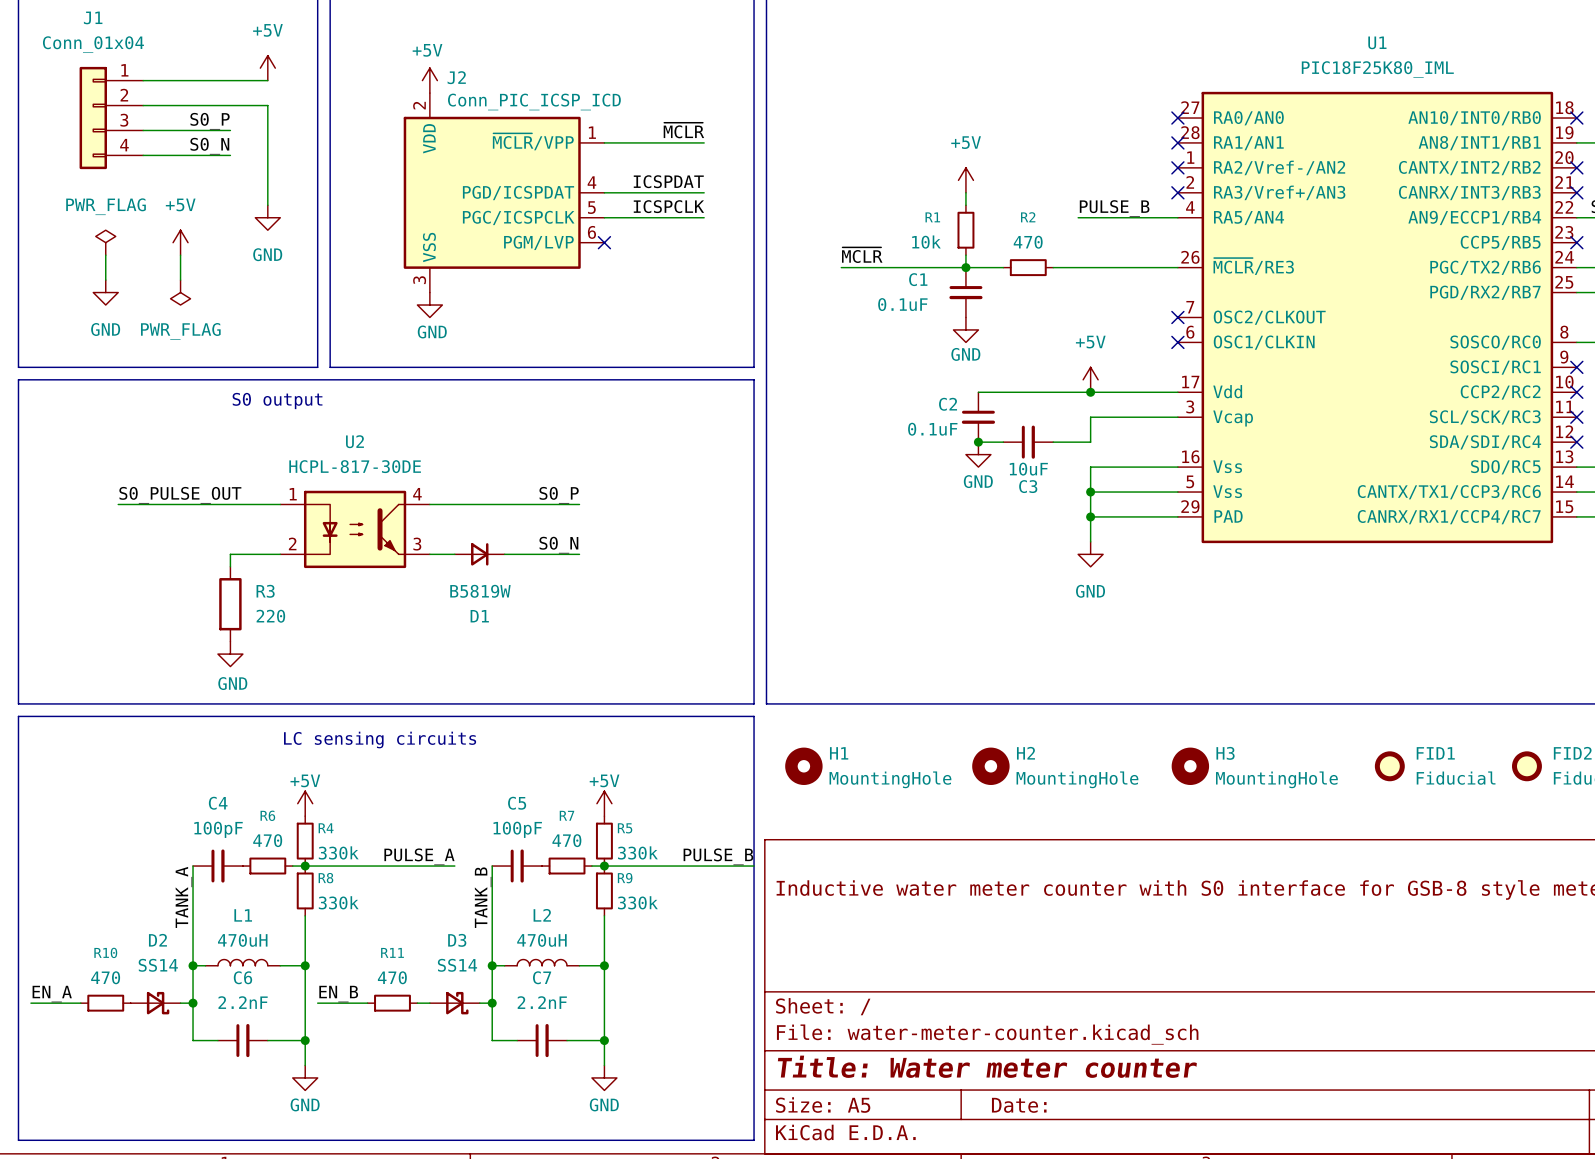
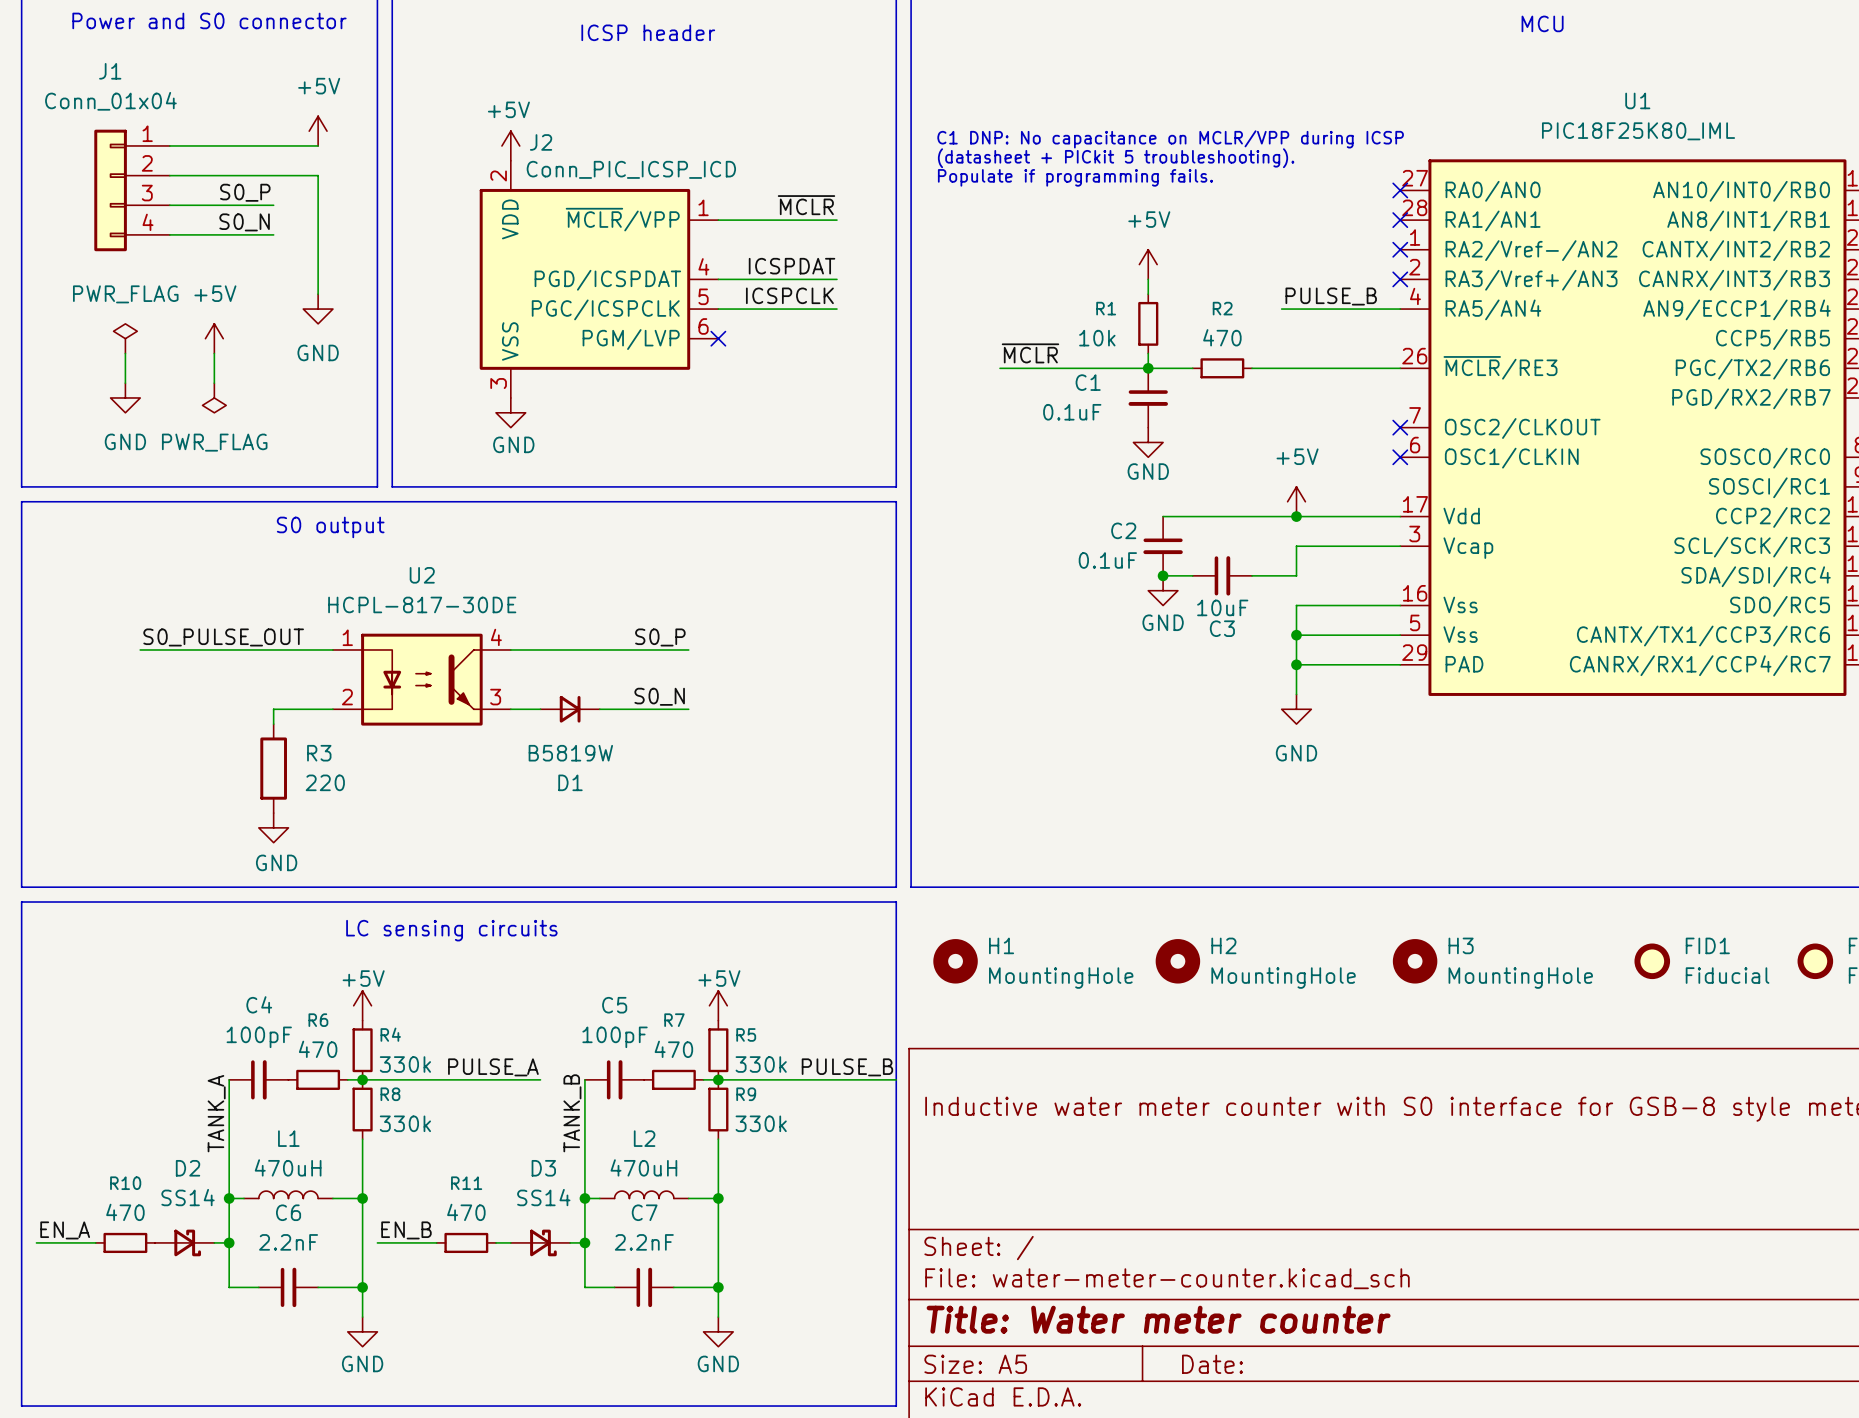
text: none -> C1 DNP: No capacitance on MCLR/VPP during ICSP (1170, 139)
text: none -> (datasheet + PICkit 5 troubleshooting). (1116, 158)
text: none -> Populate if programming fails. (1075, 177)

